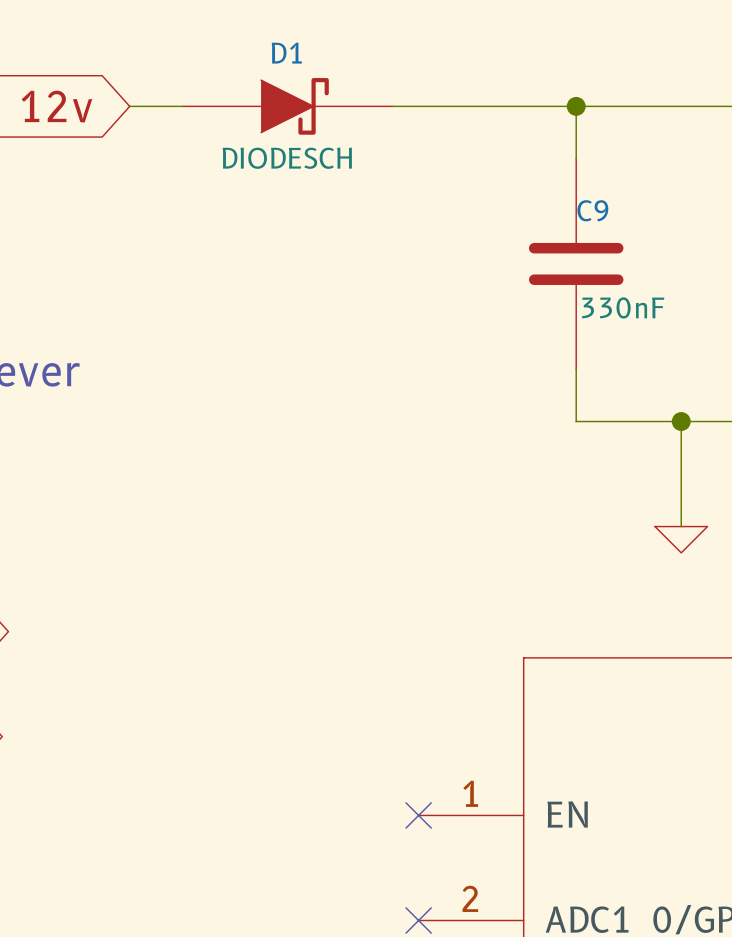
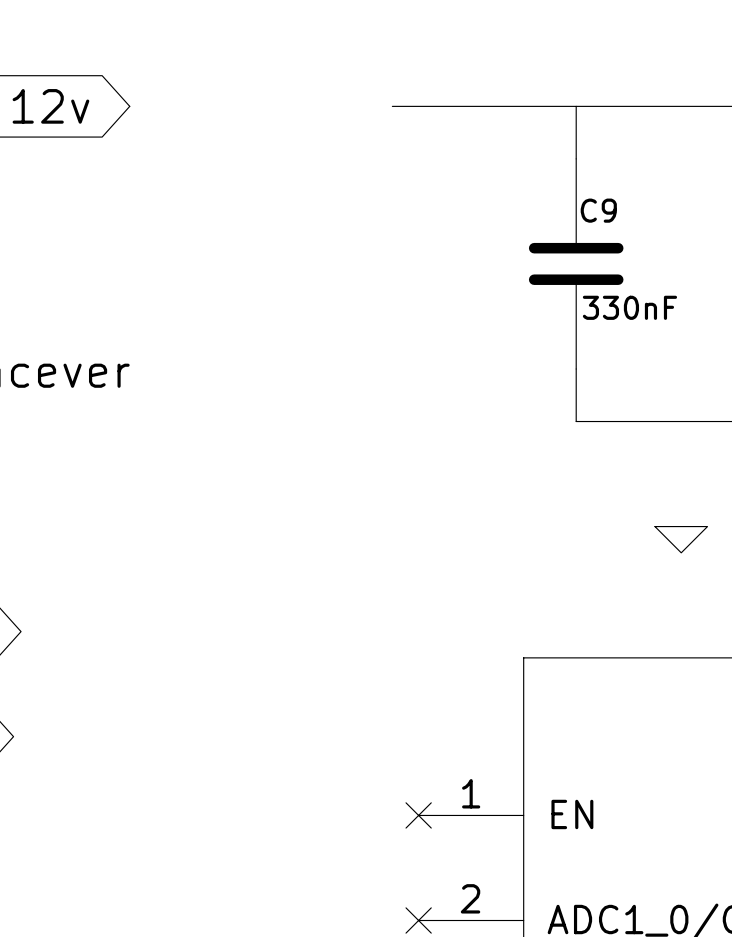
wire: (129, 106) (182, 106) -> none
D1: DIODESCH (287, 106) -> none
junction: (576, 106) -> none
wire: (681, 421) (681, 526) -> none
junction: (681, 421) -> none

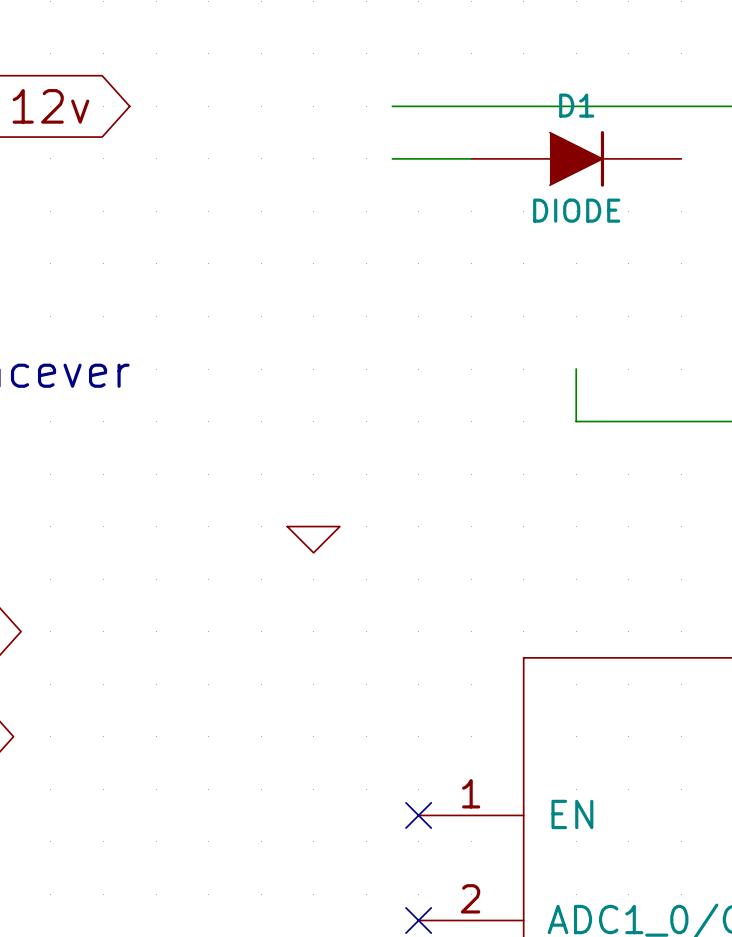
wire: (576, 106) (576, 158) -> none
wire: none -> (392, 158) (471, 158)
D1: none -> DIODE (576, 158)
C9: 330nF (576, 263) -> none
power symbol position: (681, 539) -> (313, 539)

